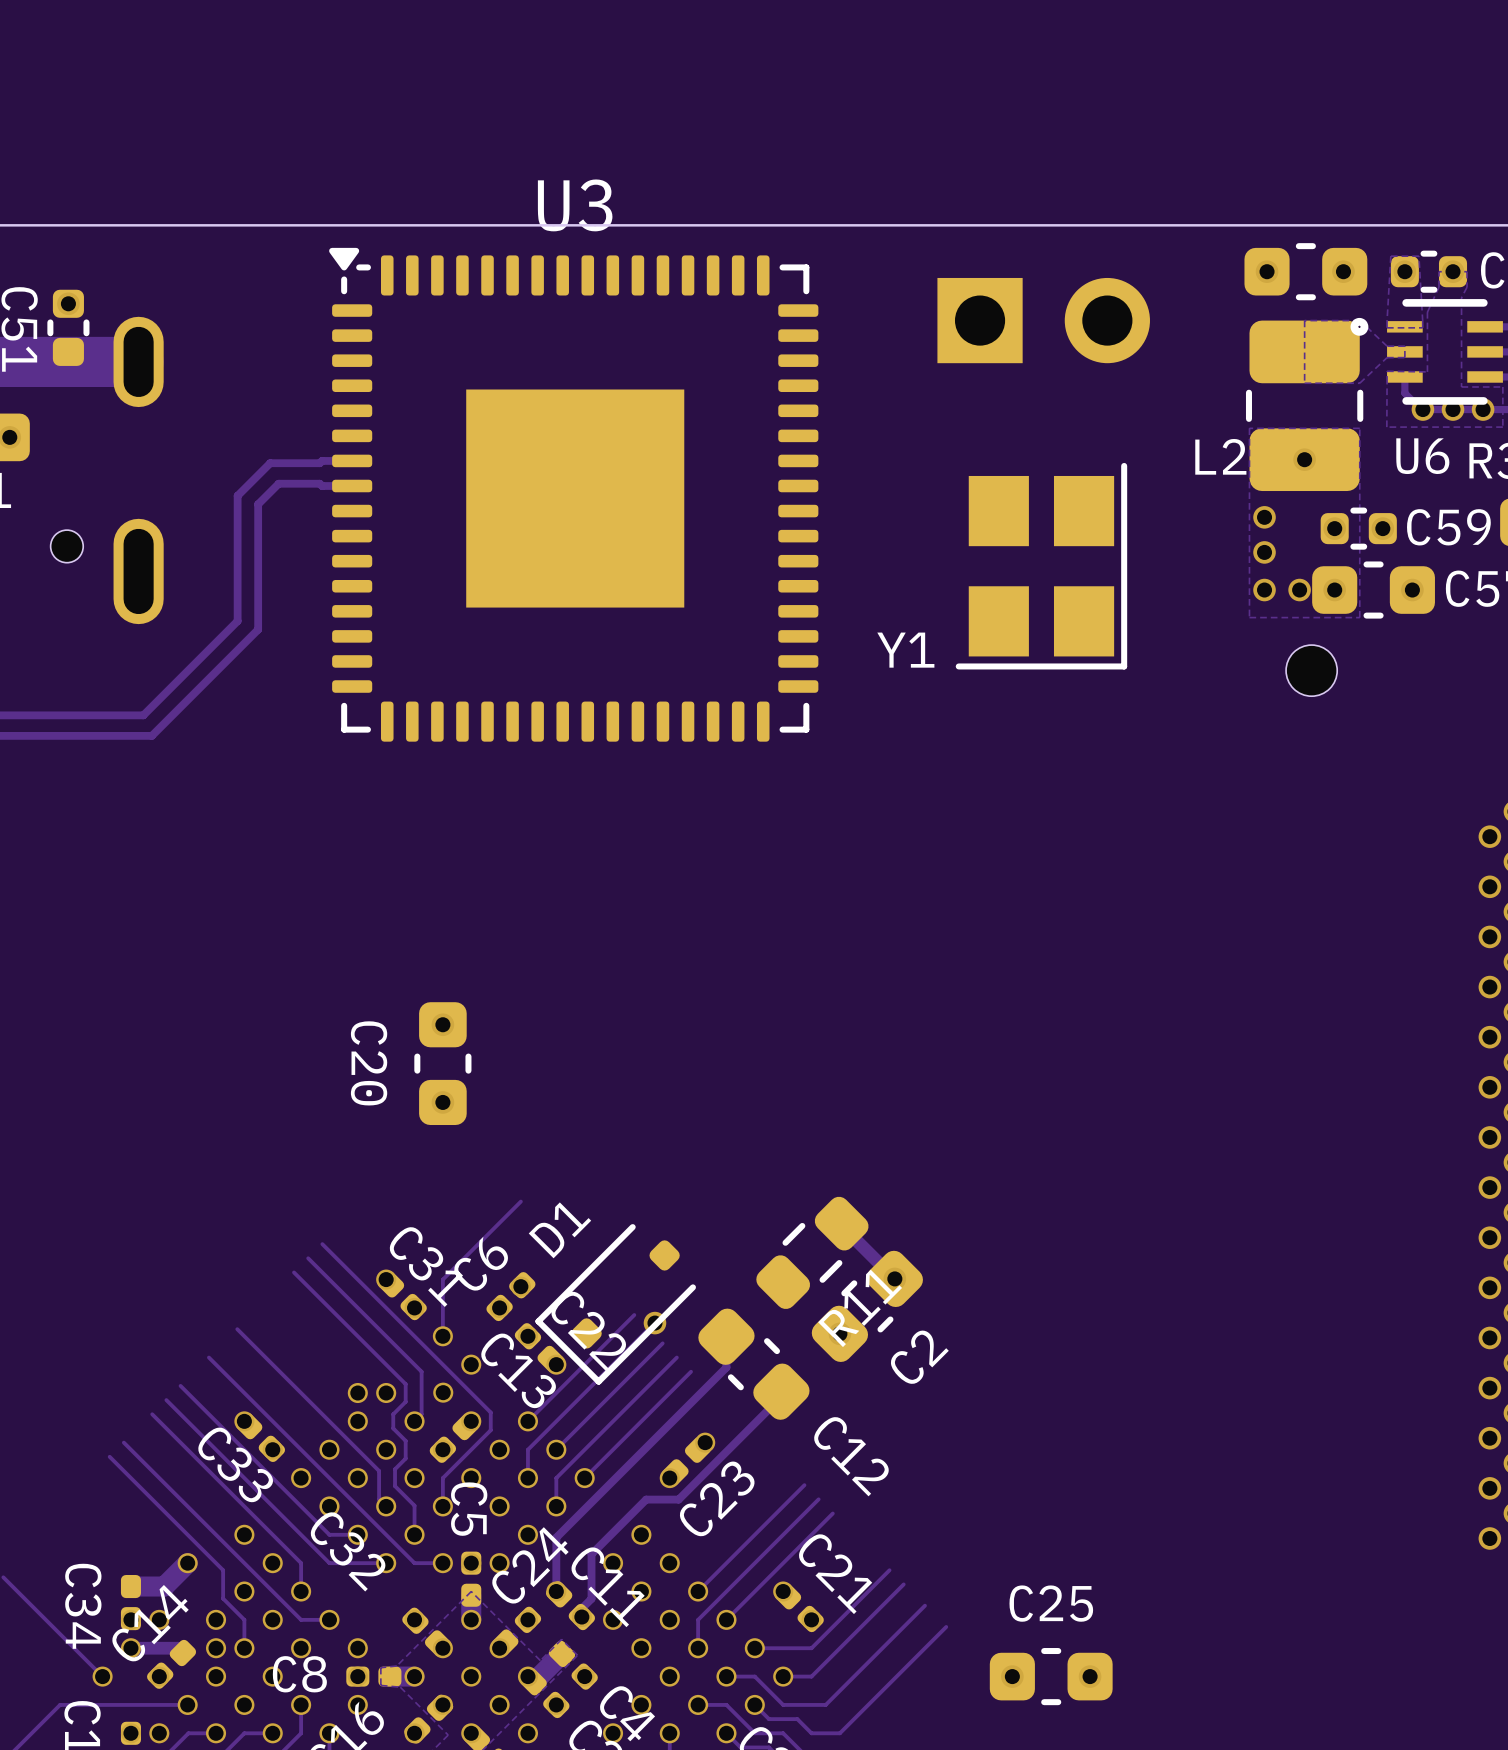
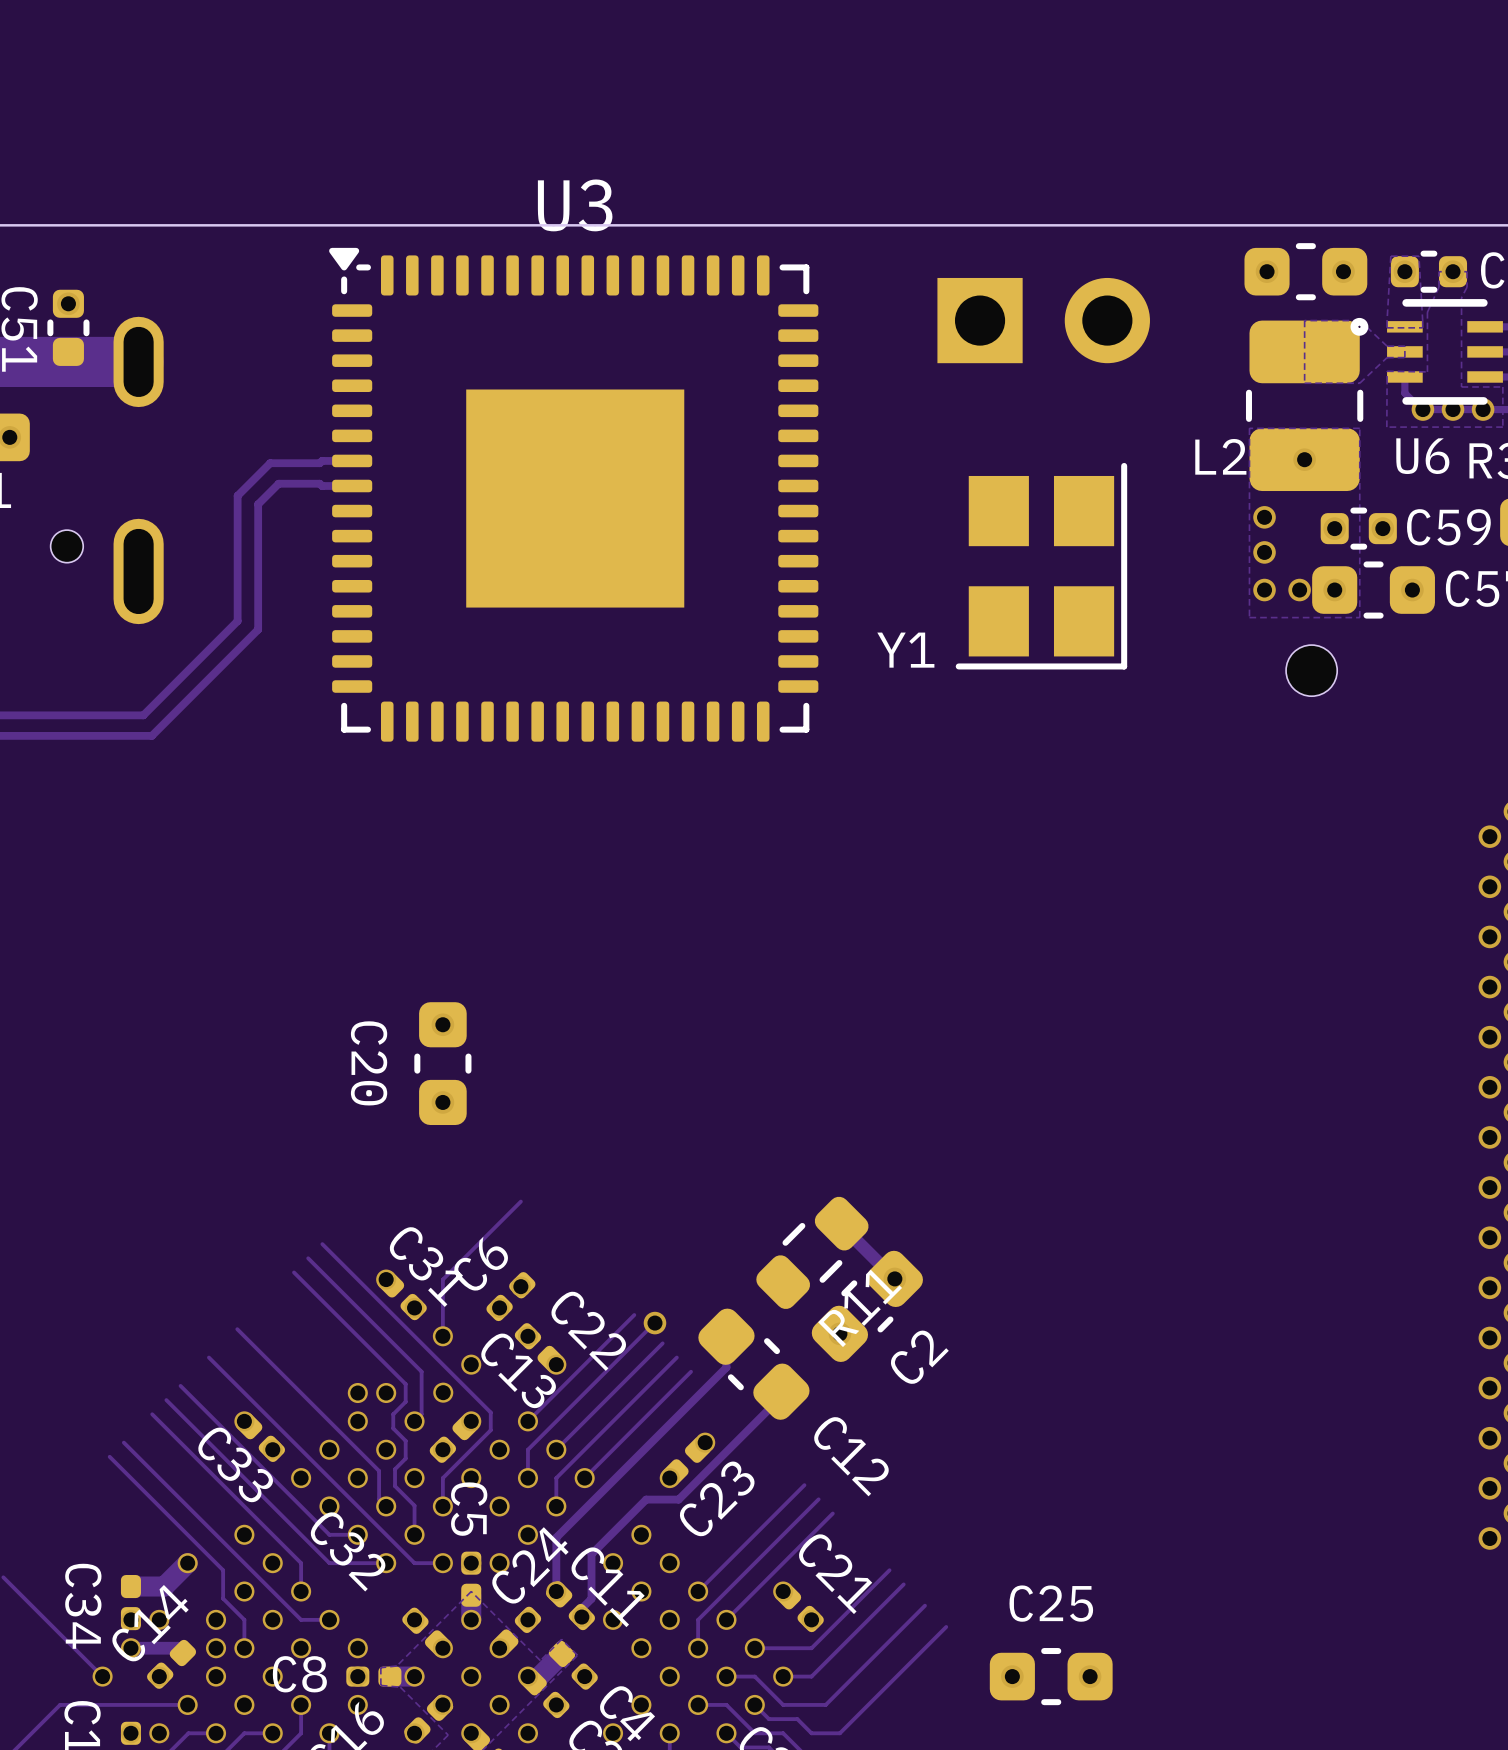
D1: (615, 1304) -> none

